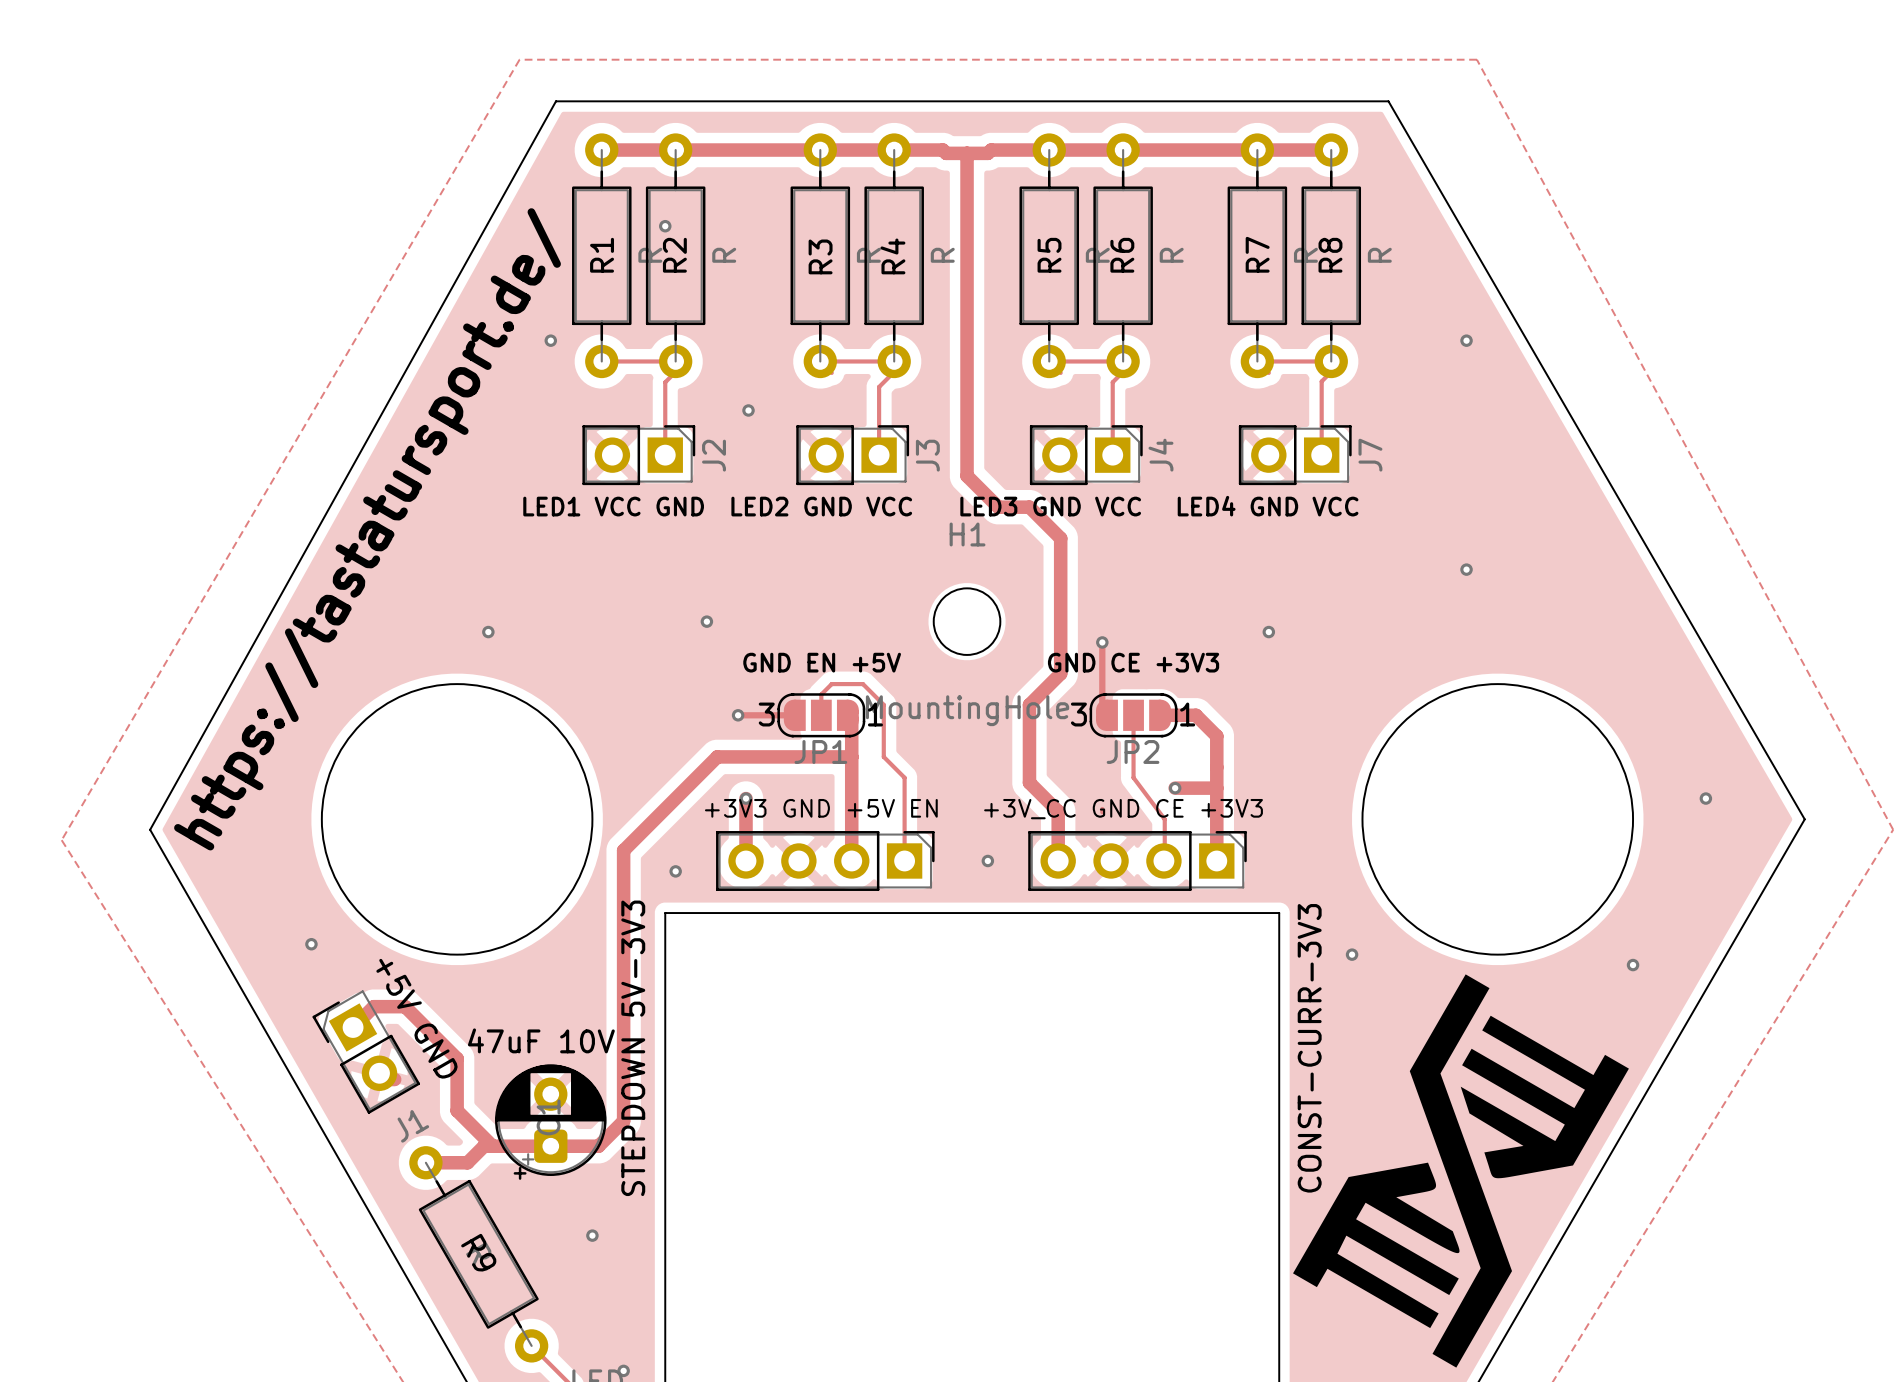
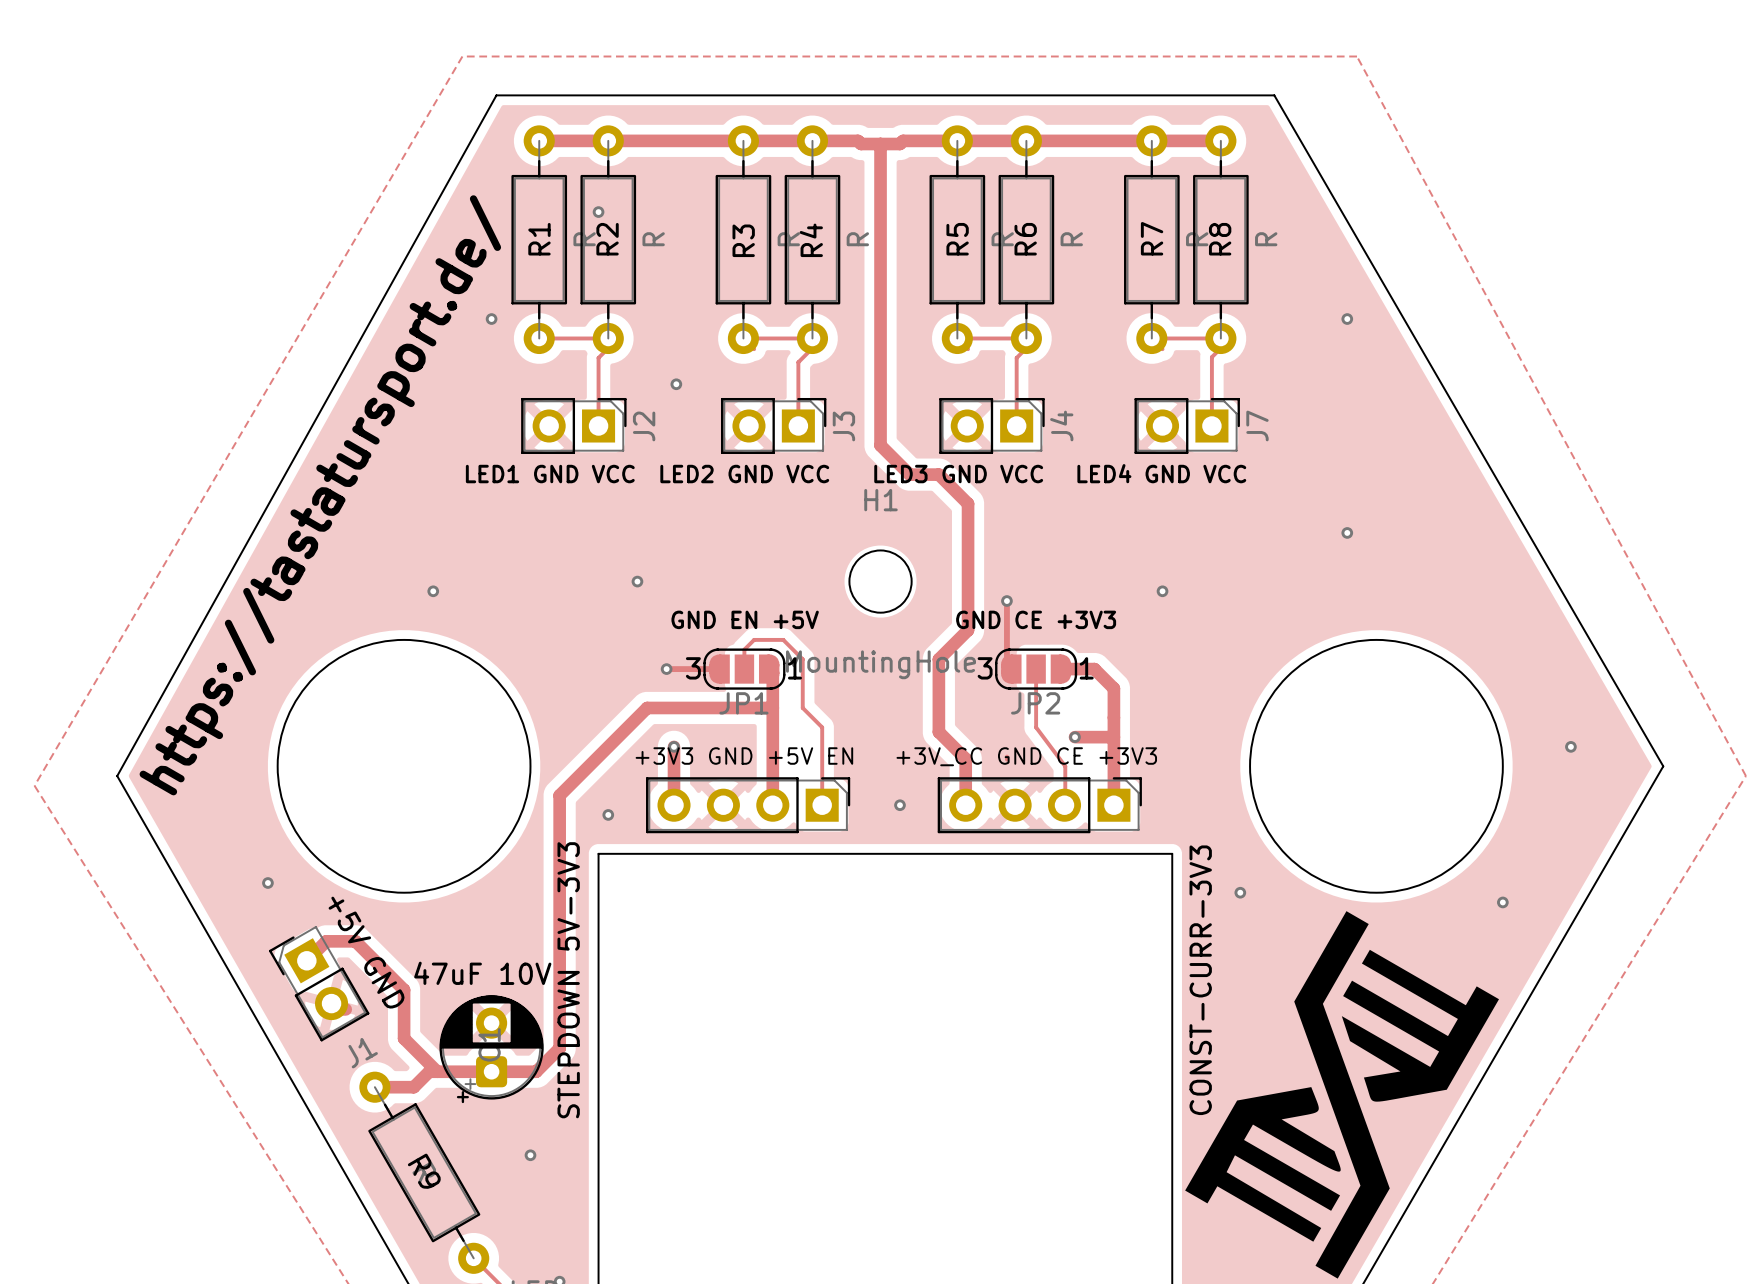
J2 value: LED1 VCC GND (613, 506) -> LED1 GND VCC (550, 474)

